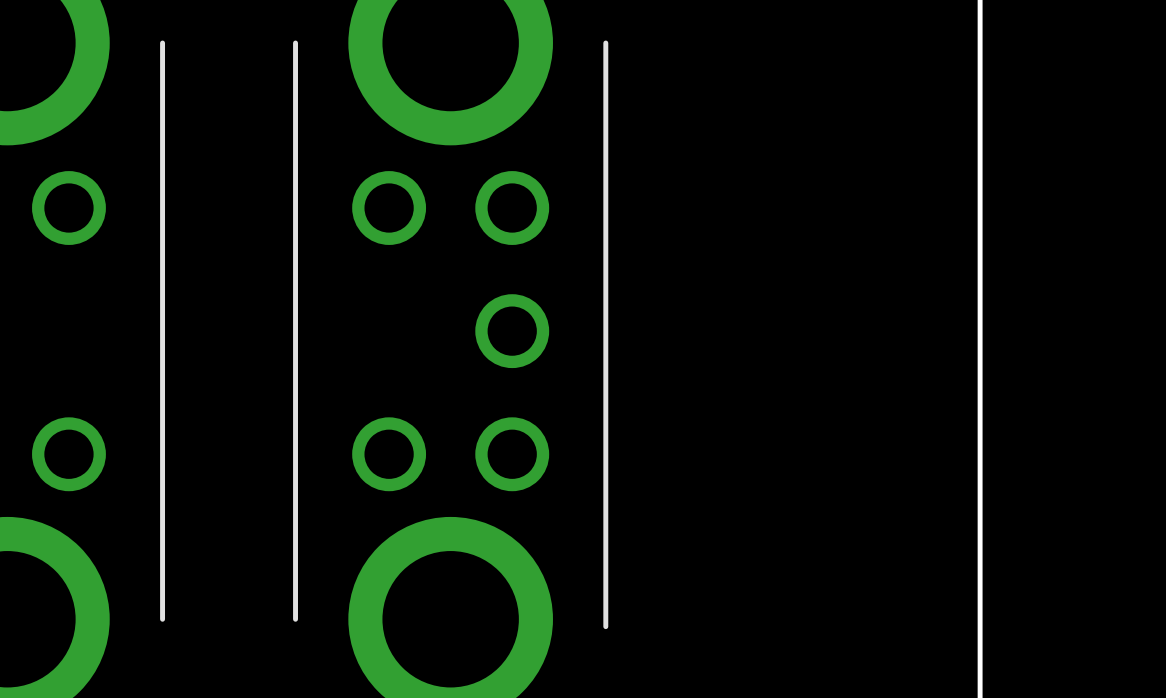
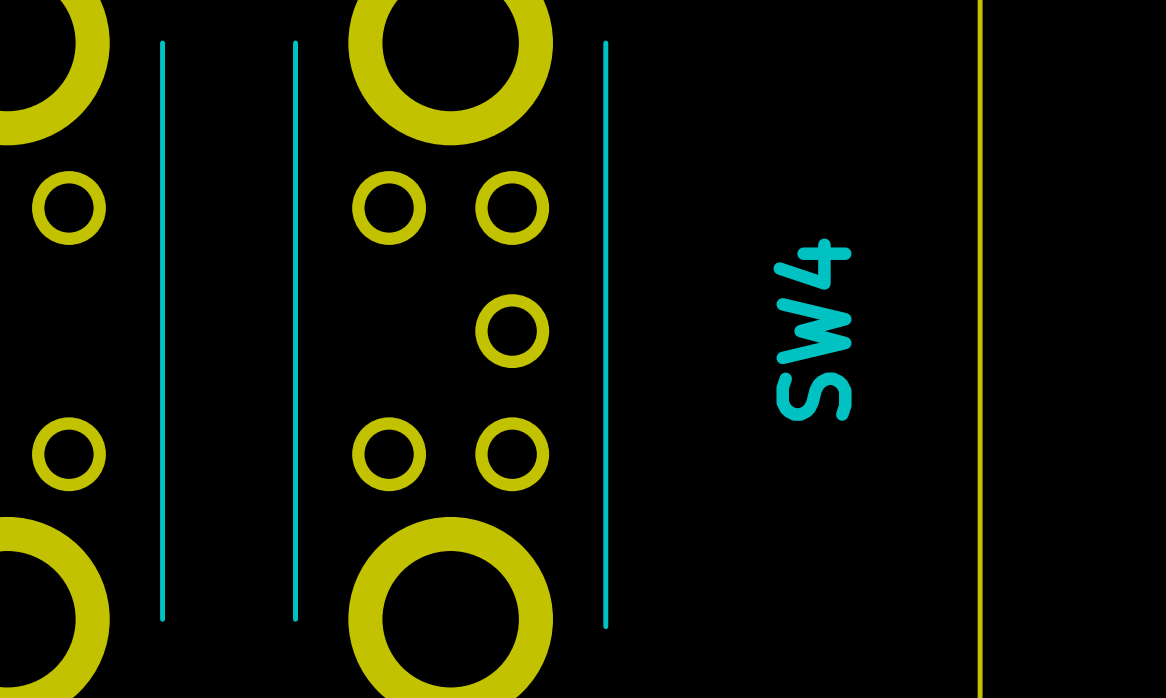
SW4 name: none -> SW4 (812, 329)

